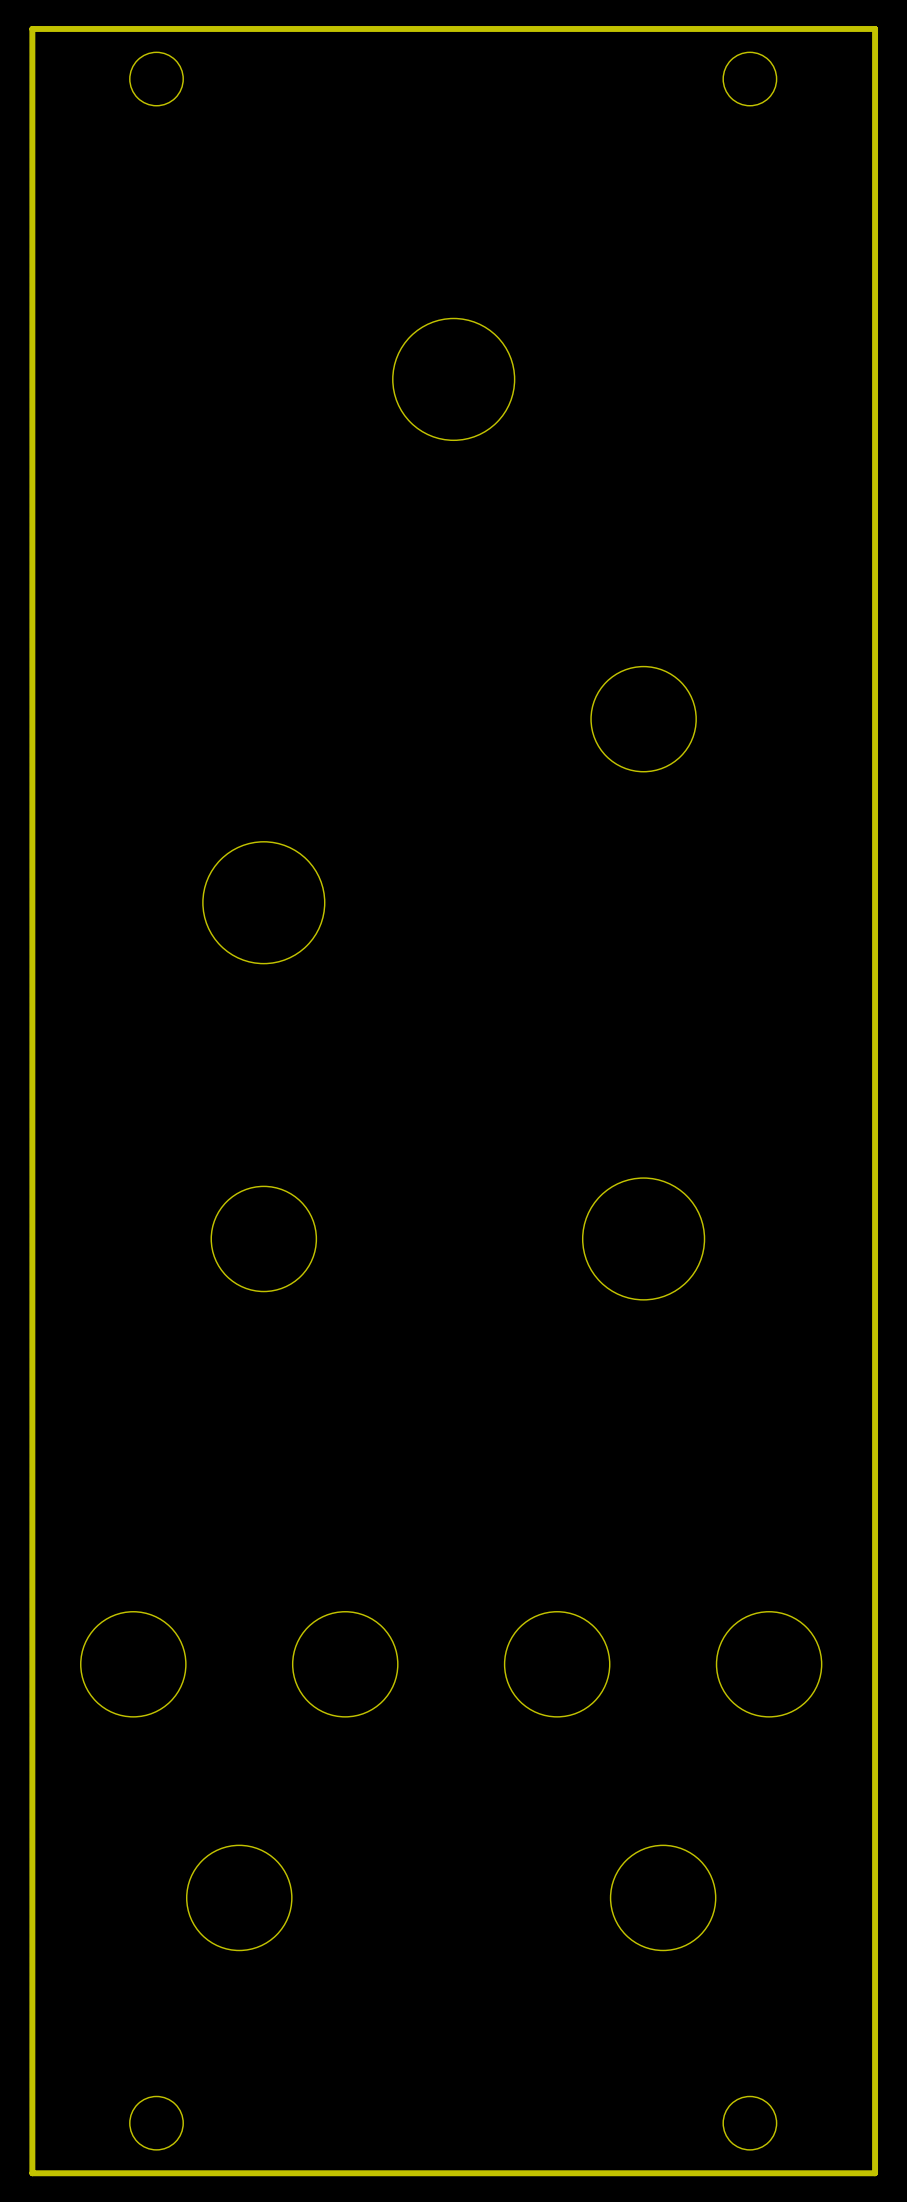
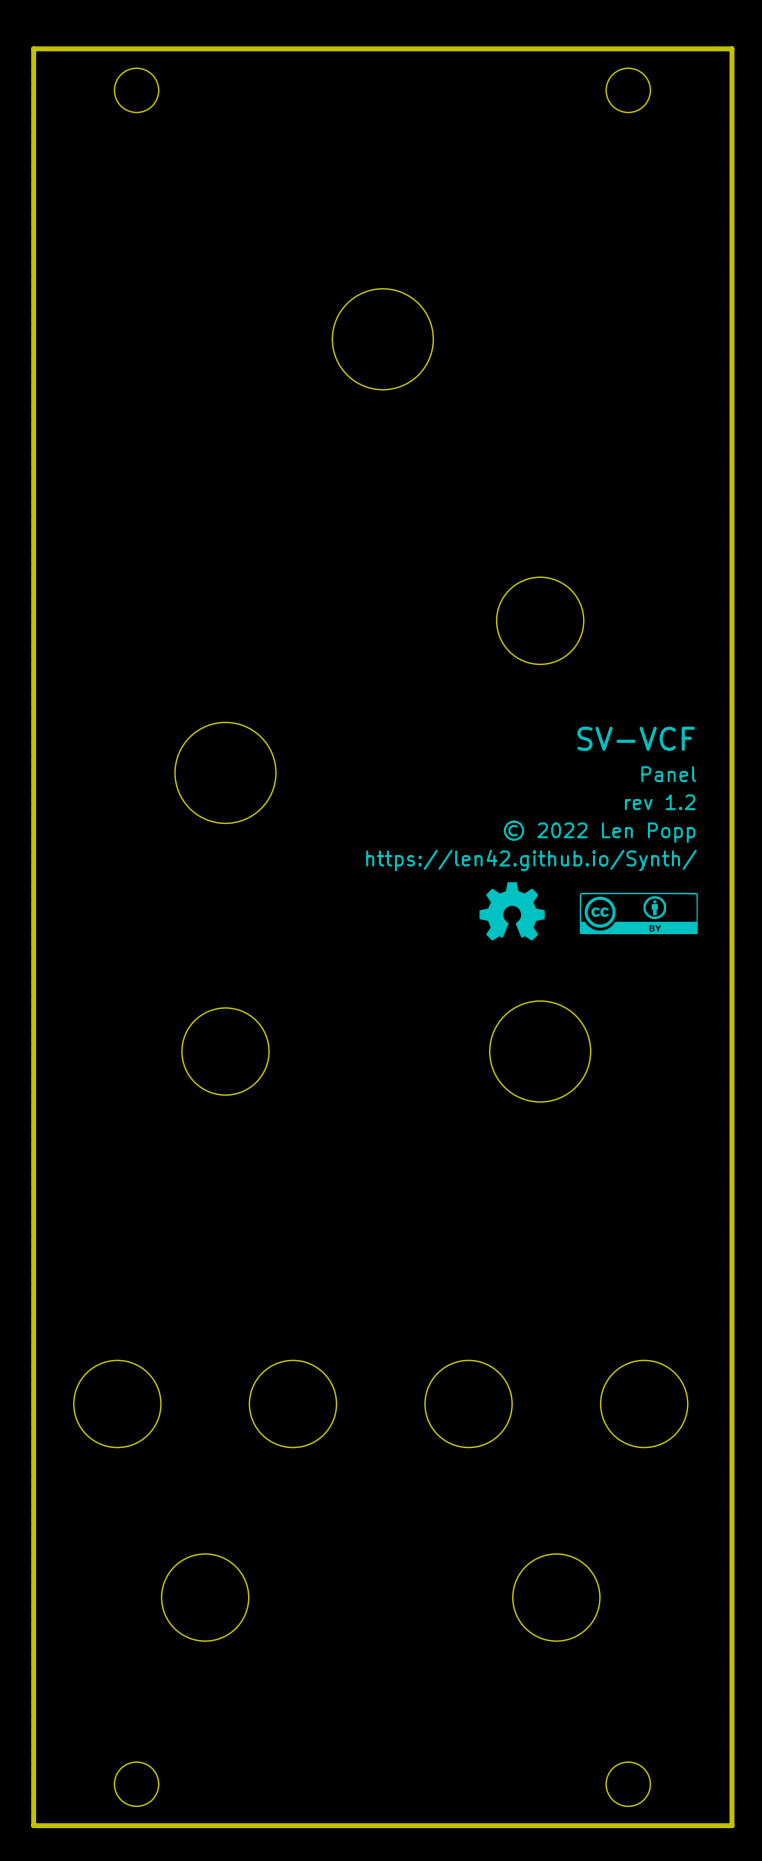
text: none -> SV-VCF (636, 738)
text: none -> Panel (668, 774)
text: none -> rev 1.2 (660, 802)
text: none -> © 2022 Len Popp (599, 831)
text: none -> https://len42.github.io/Synth/ (531, 860)
drawing: none -> [479, 882, 545, 941]
drawing: none -> [579, 892, 698, 935]

